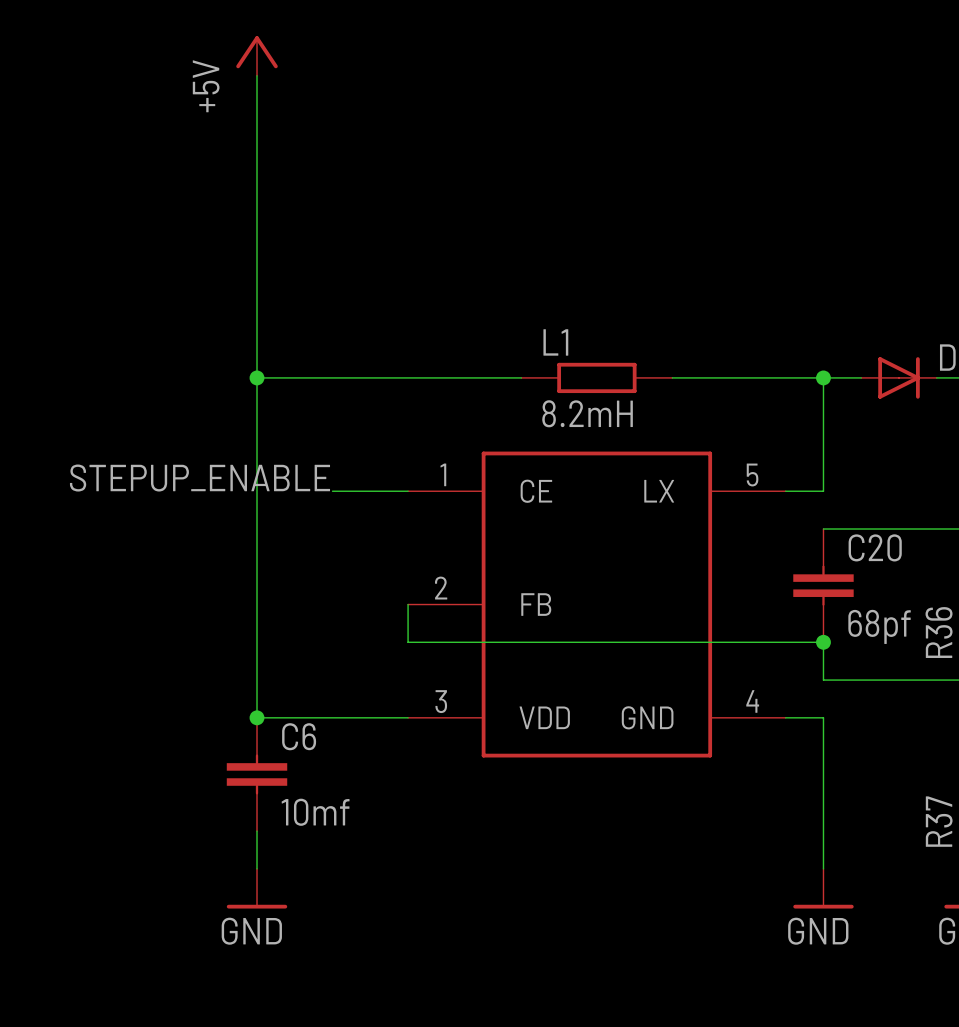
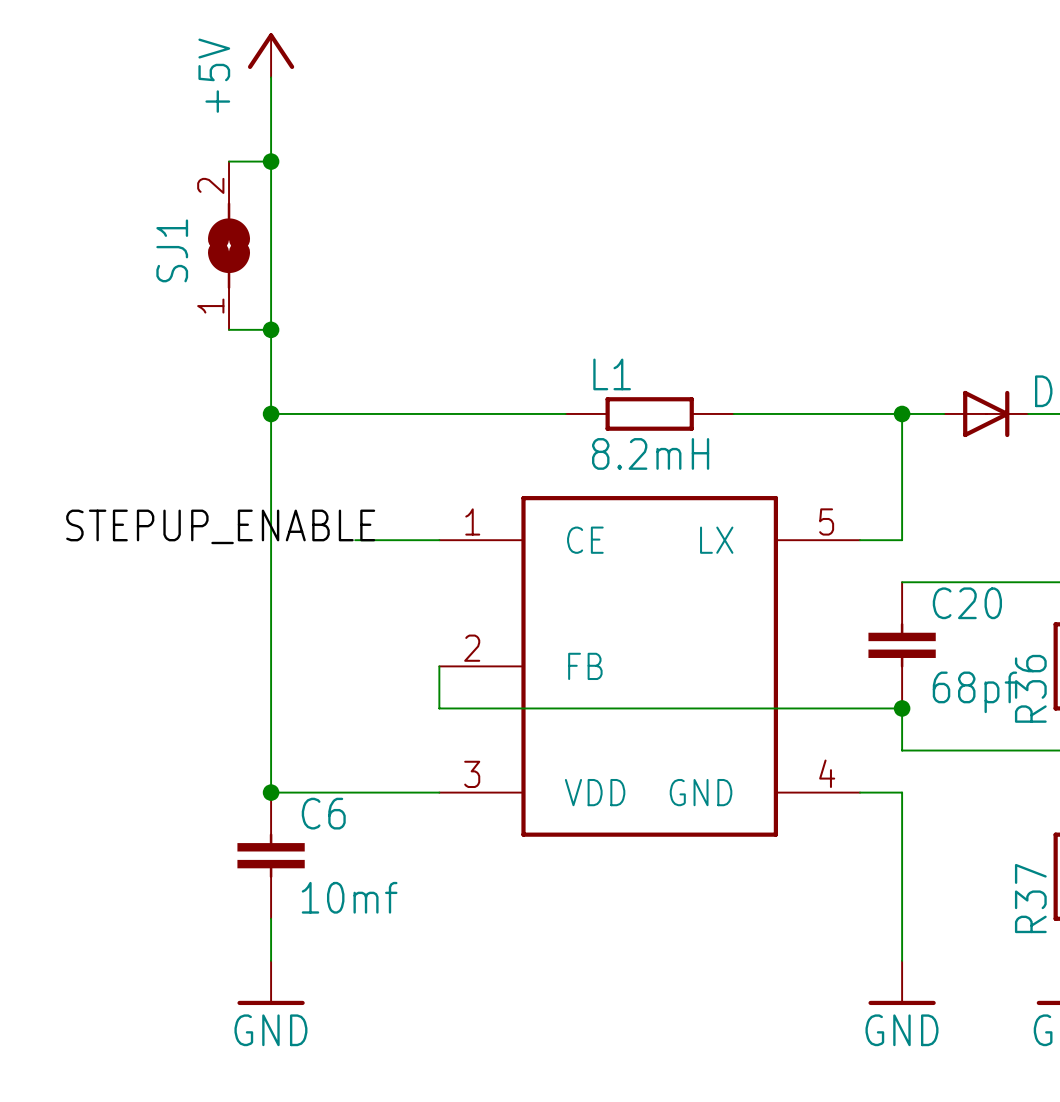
wire: none -> (229, 161) (271, 161)
junction: none -> (271, 161)
SJ1: none -> (229, 245)
wire: none -> (229, 329) (271, 329)
junction: none -> (271, 329)

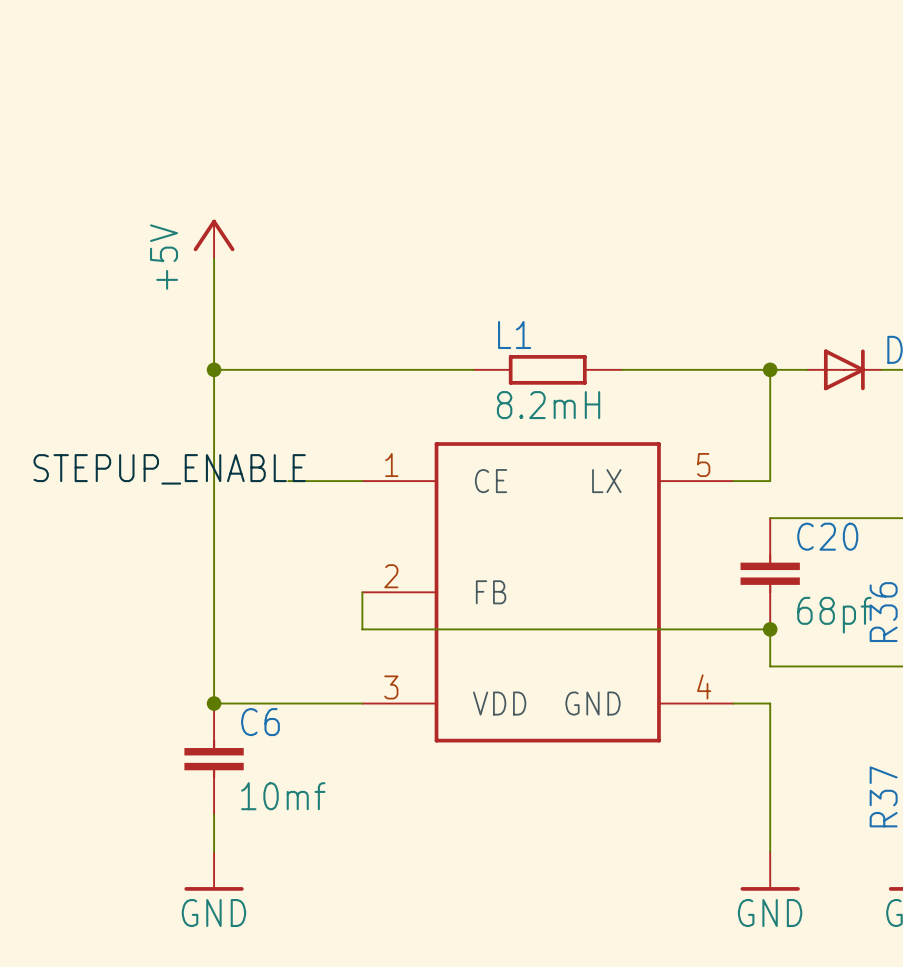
power symbol position: +5V (271, 55) -> +5V (214, 239)
wire: (271, 77) (271, 287) -> none
wire: (229, 161) (271, 161) -> none
junction: (271, 161) -> none
SJ1: (229, 245) -> none
wire: (229, 329) (271, 329) -> none
junction: (271, 329) -> none

